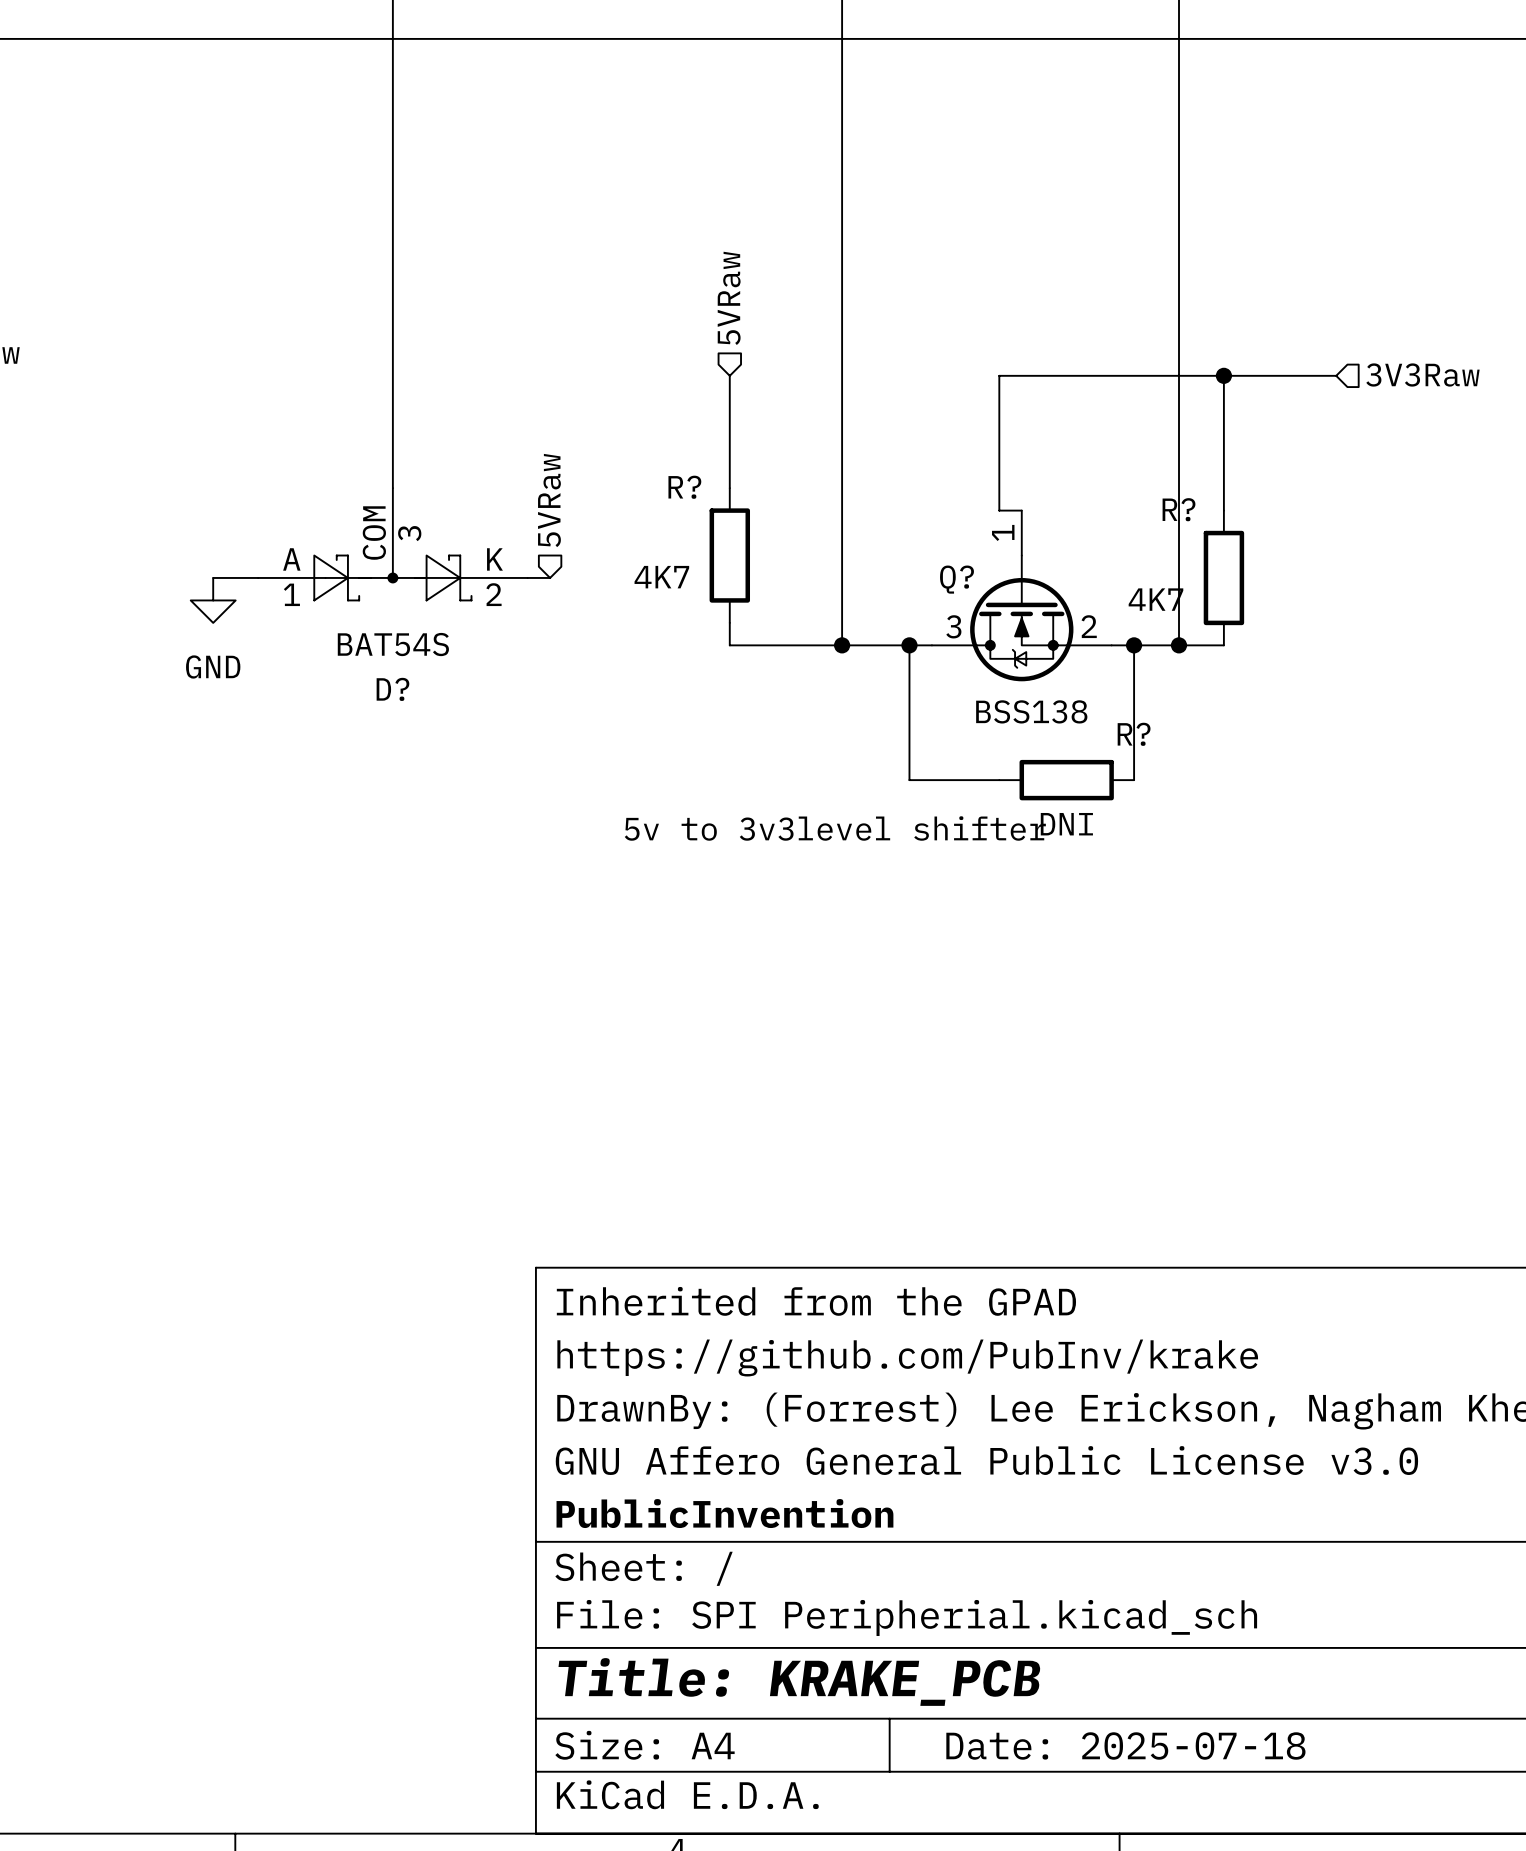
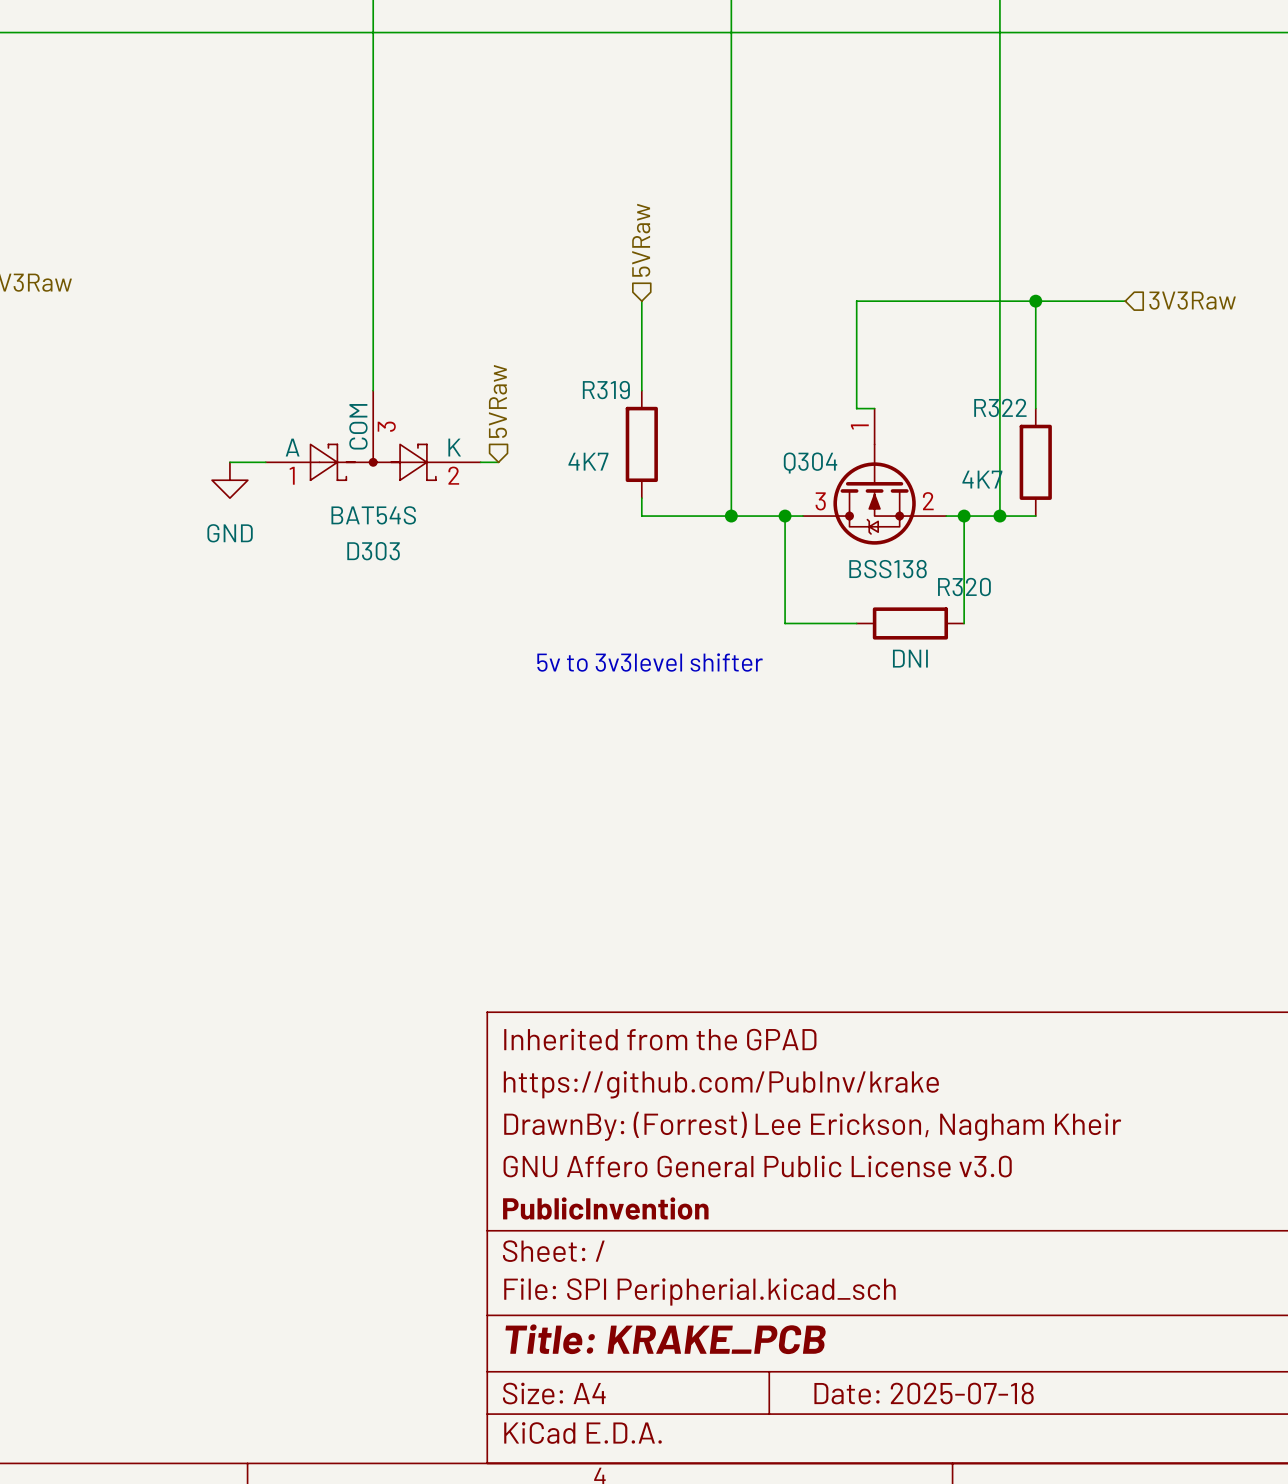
R? name: R? (684, 487) -> R319 (606, 390)
R? name: R? (1179, 509) -> R322 (1000, 407)
Q? name: Q? (957, 579) -> Q304 (810, 463)
D? name: D? (392, 689) -> D303 (373, 551)
R? name: R? (1134, 734) -> R320 (964, 587)

